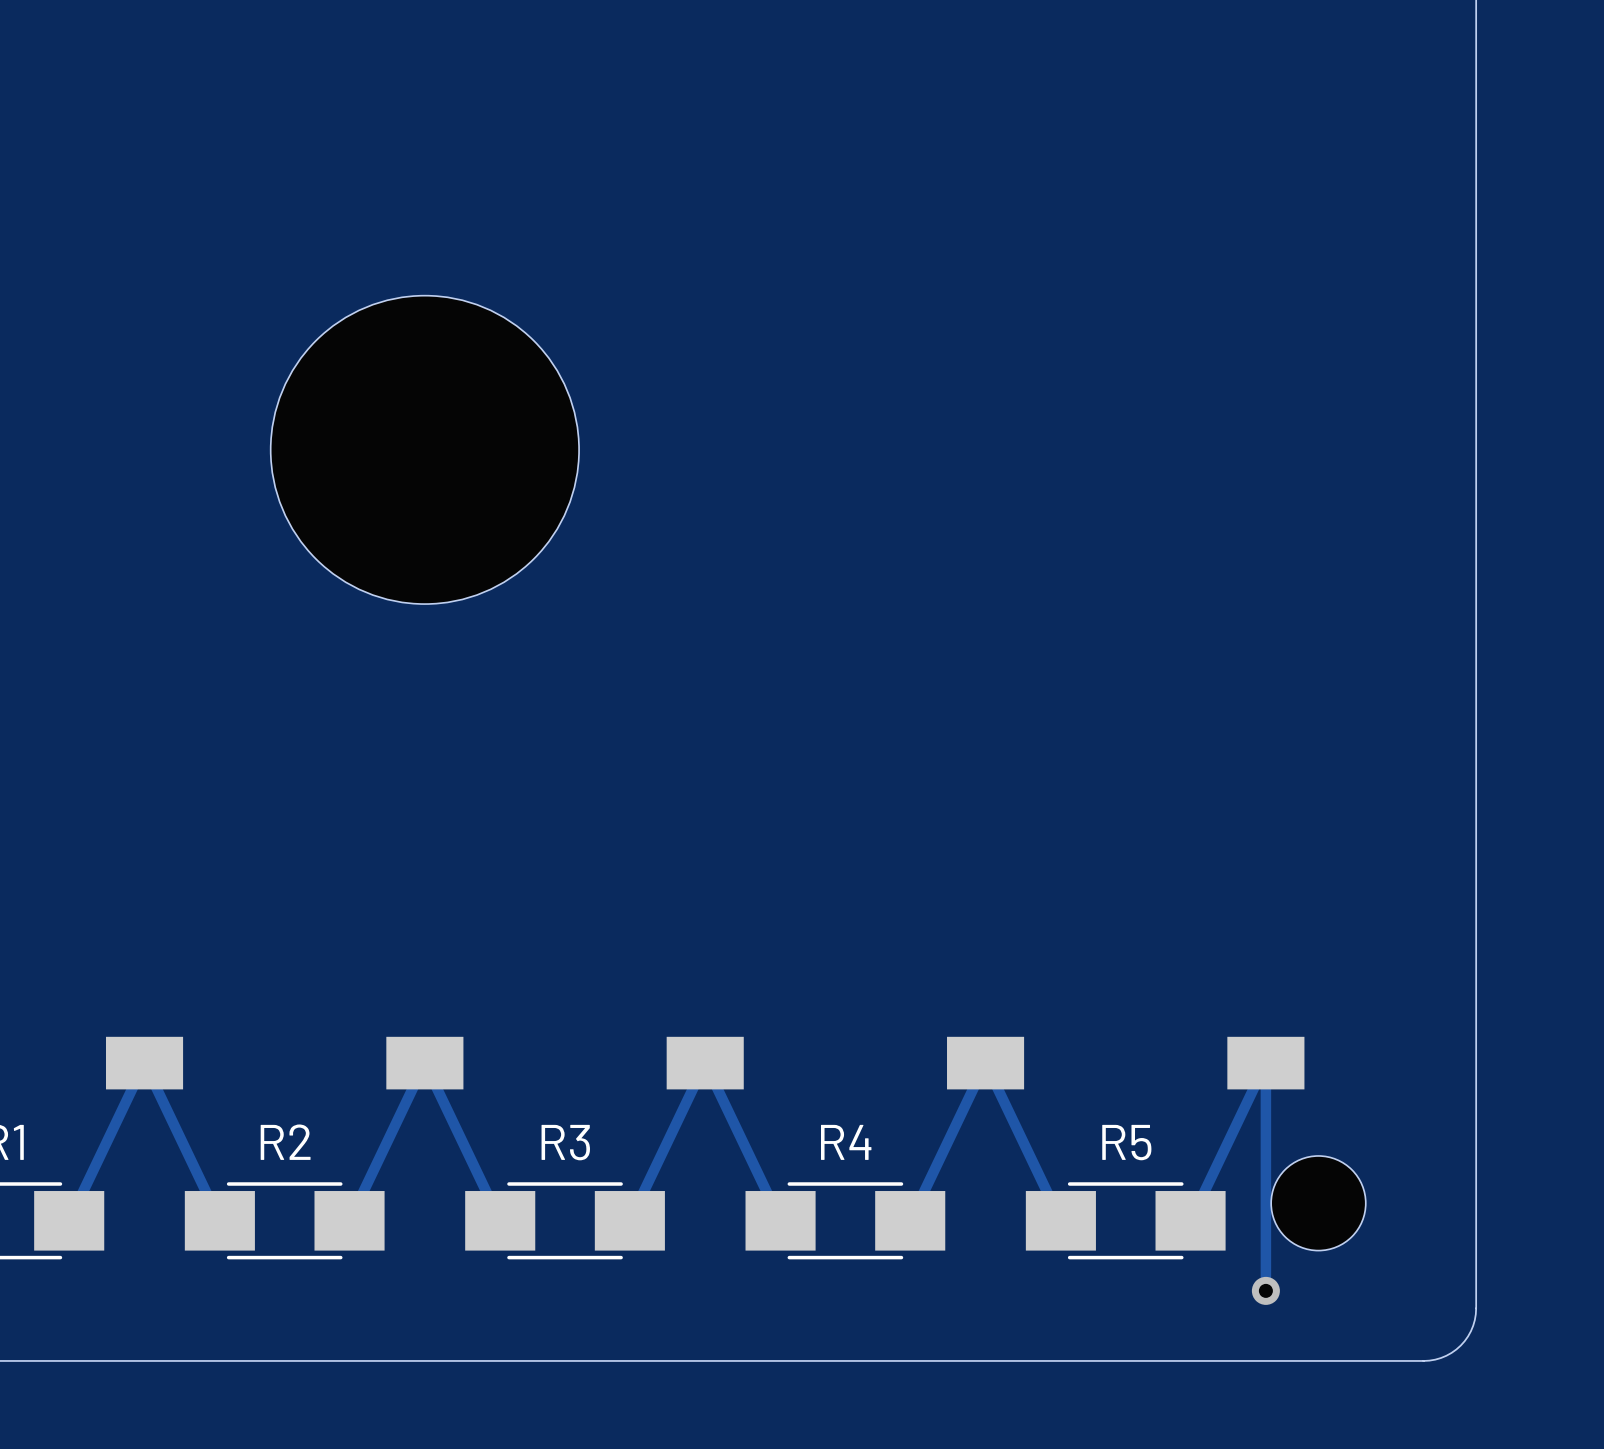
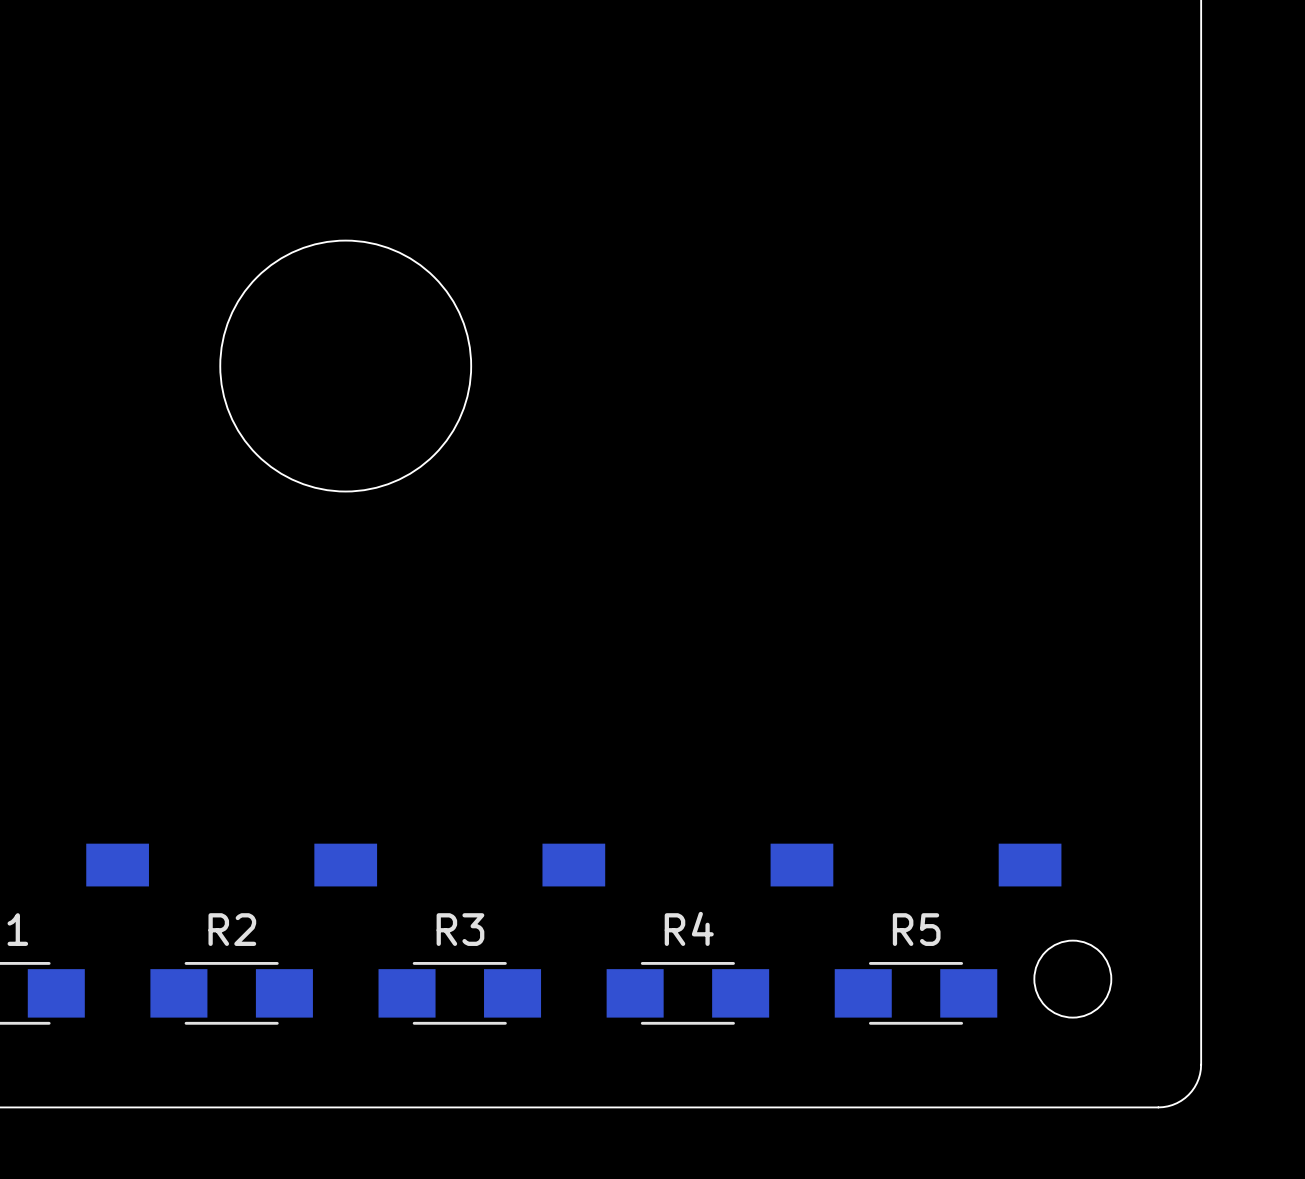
track: (219, 1220) (144, 1063) (69, 1220) -> none
track: (500, 1220) (424, 1063) (349, 1220) -> none
track: (780, 1220) (705, 1063) (629, 1220) -> none
track: (1060, 1220) (985, 1063) (910, 1220) -> none
track: (1190, 1220) (1265, 1063) (1265, 1290) -> none
via: (1265, 1290) -> none

